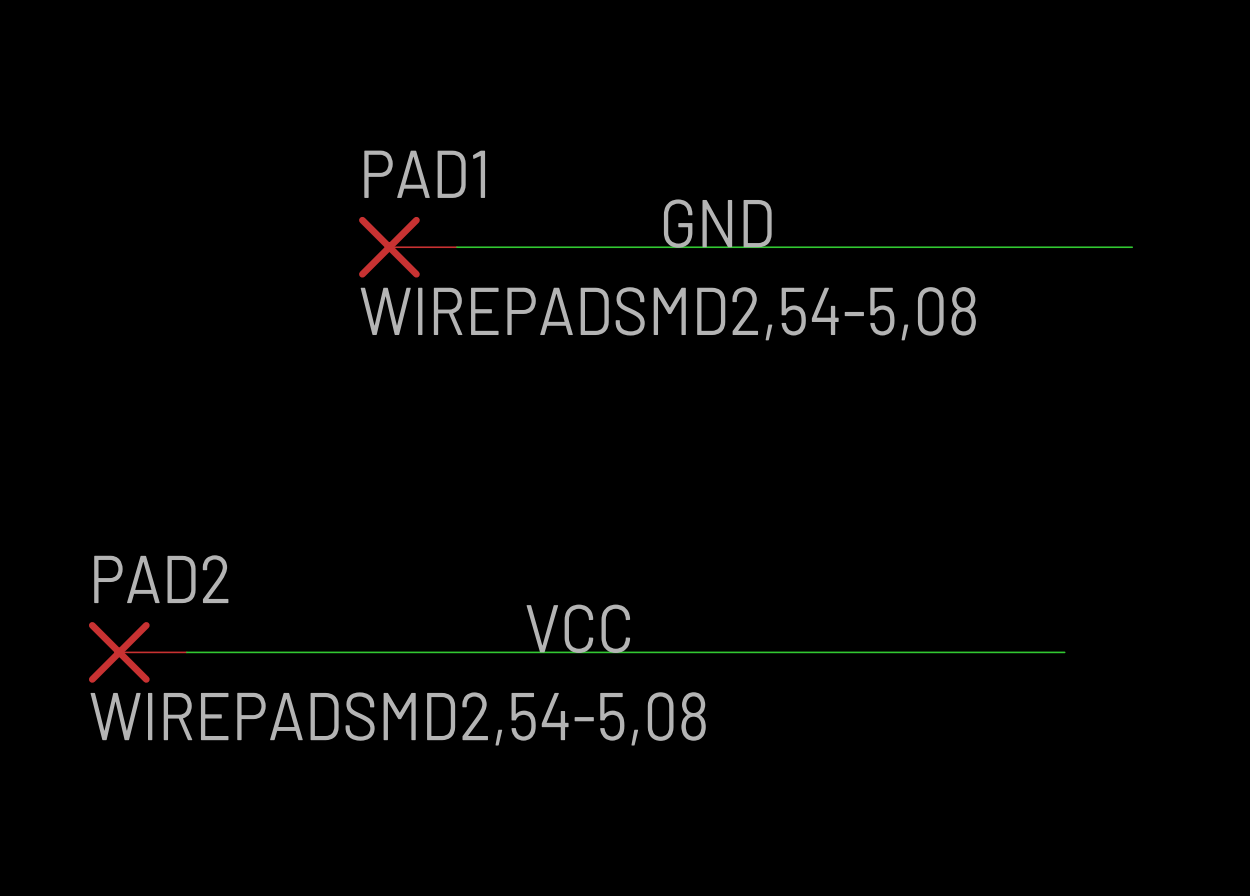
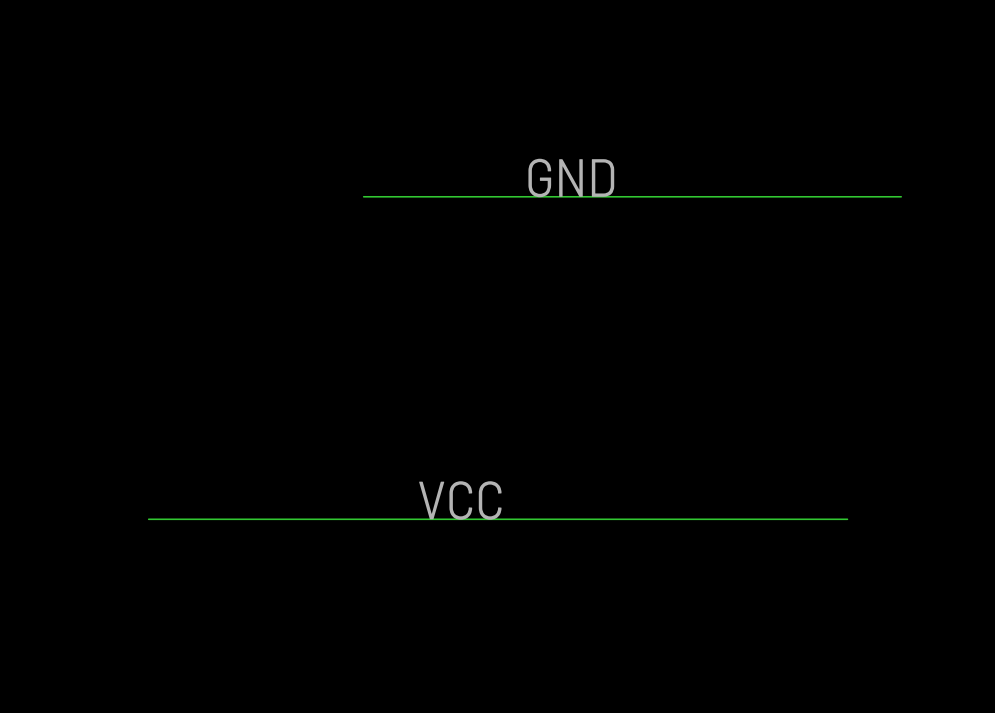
PAD1: WIREPADSMD2,54-5,08 (407, 247) -> none
PAD2: WIREPADSMD2,54-5,08 (137, 652) -> none

